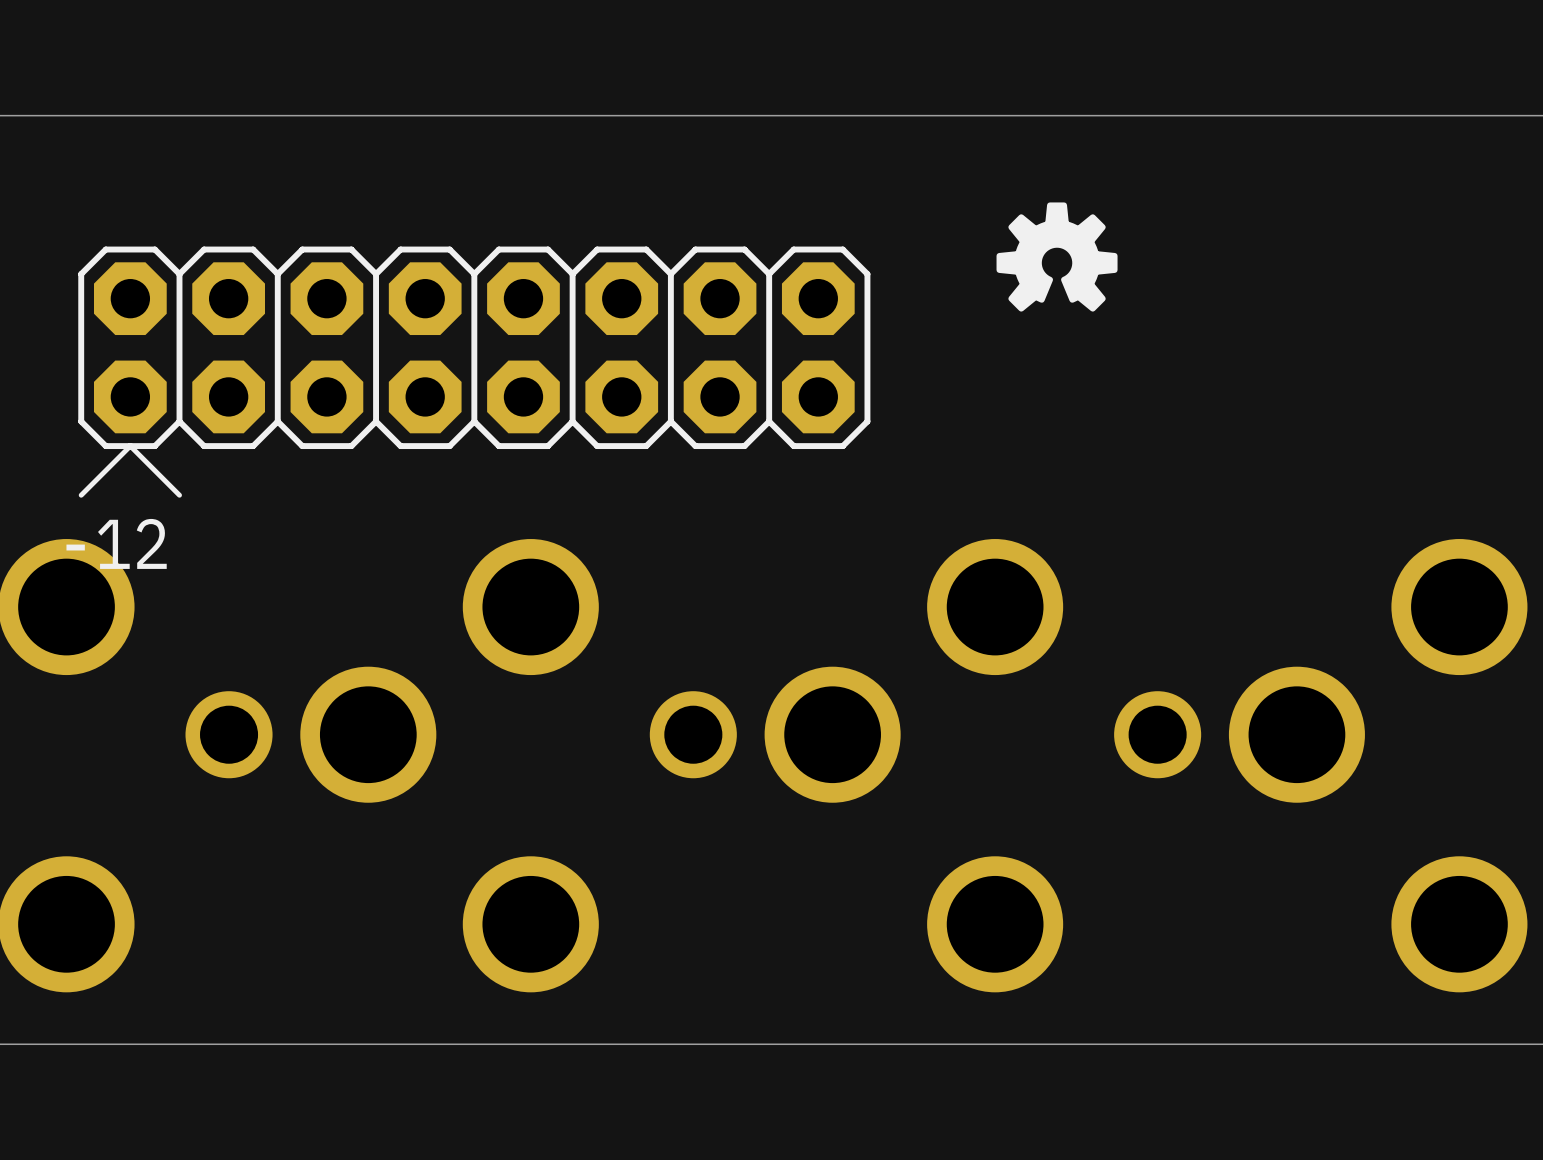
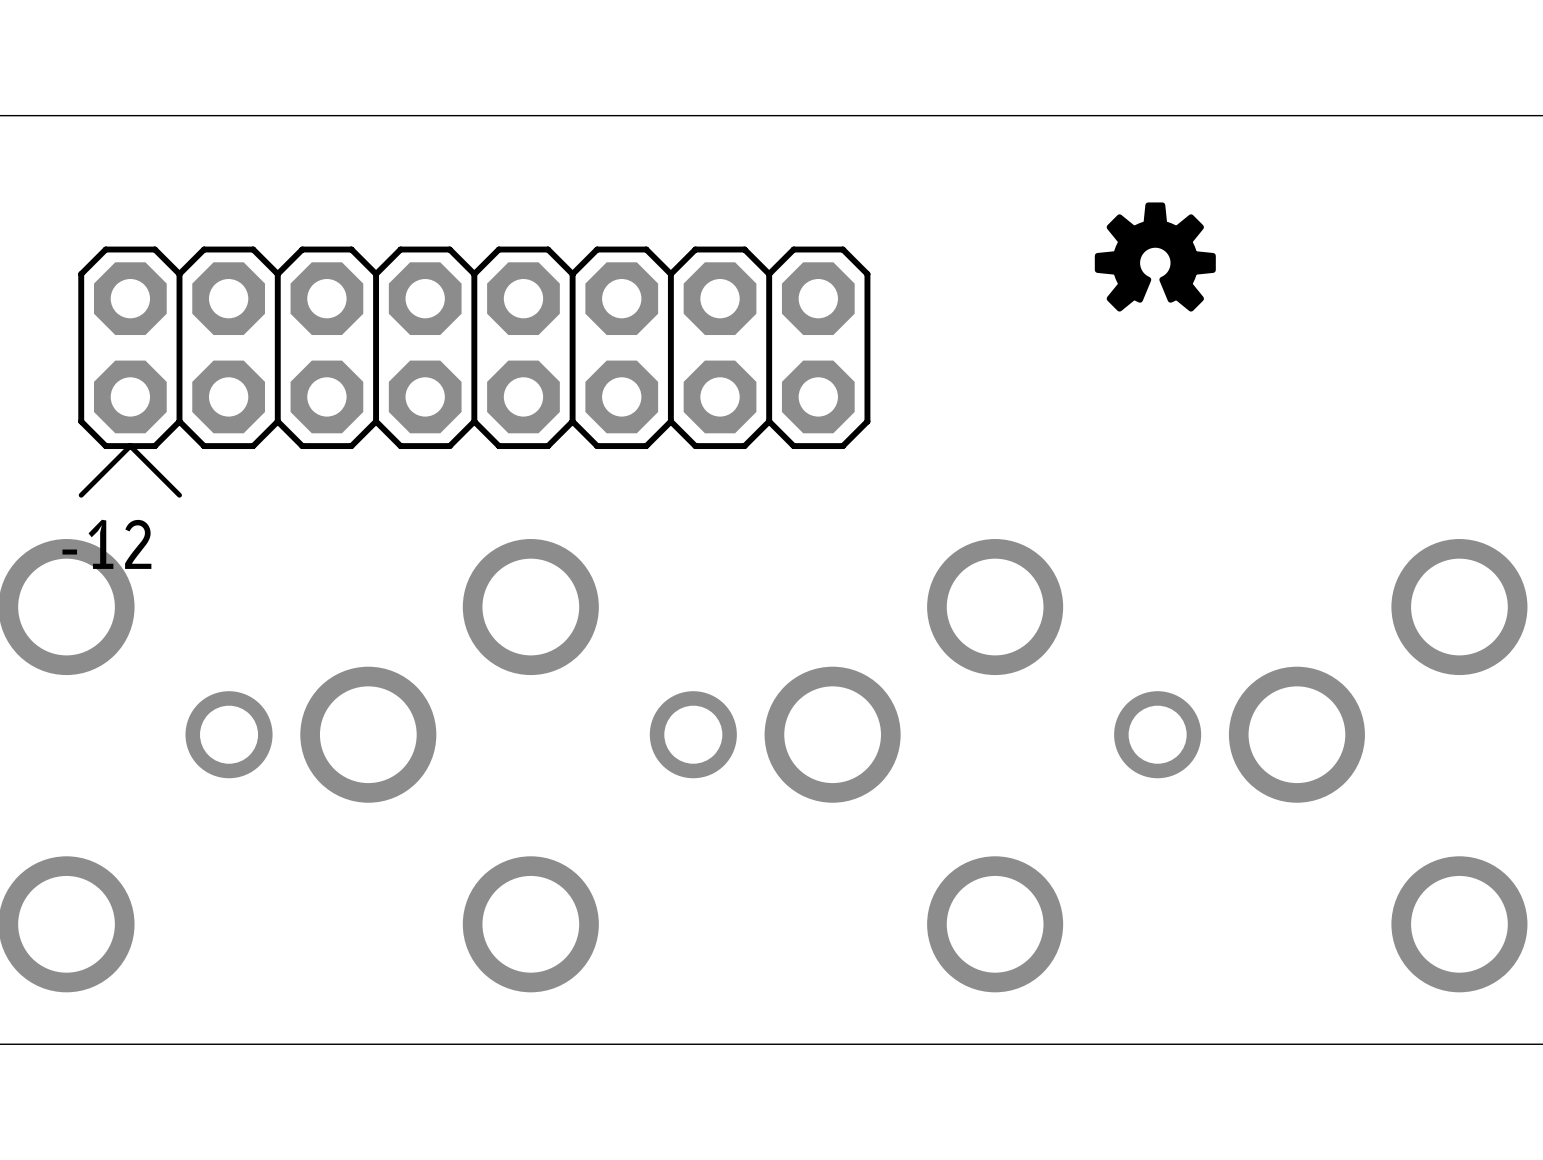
drawing position: (1057, 257) -> (1155, 257)

